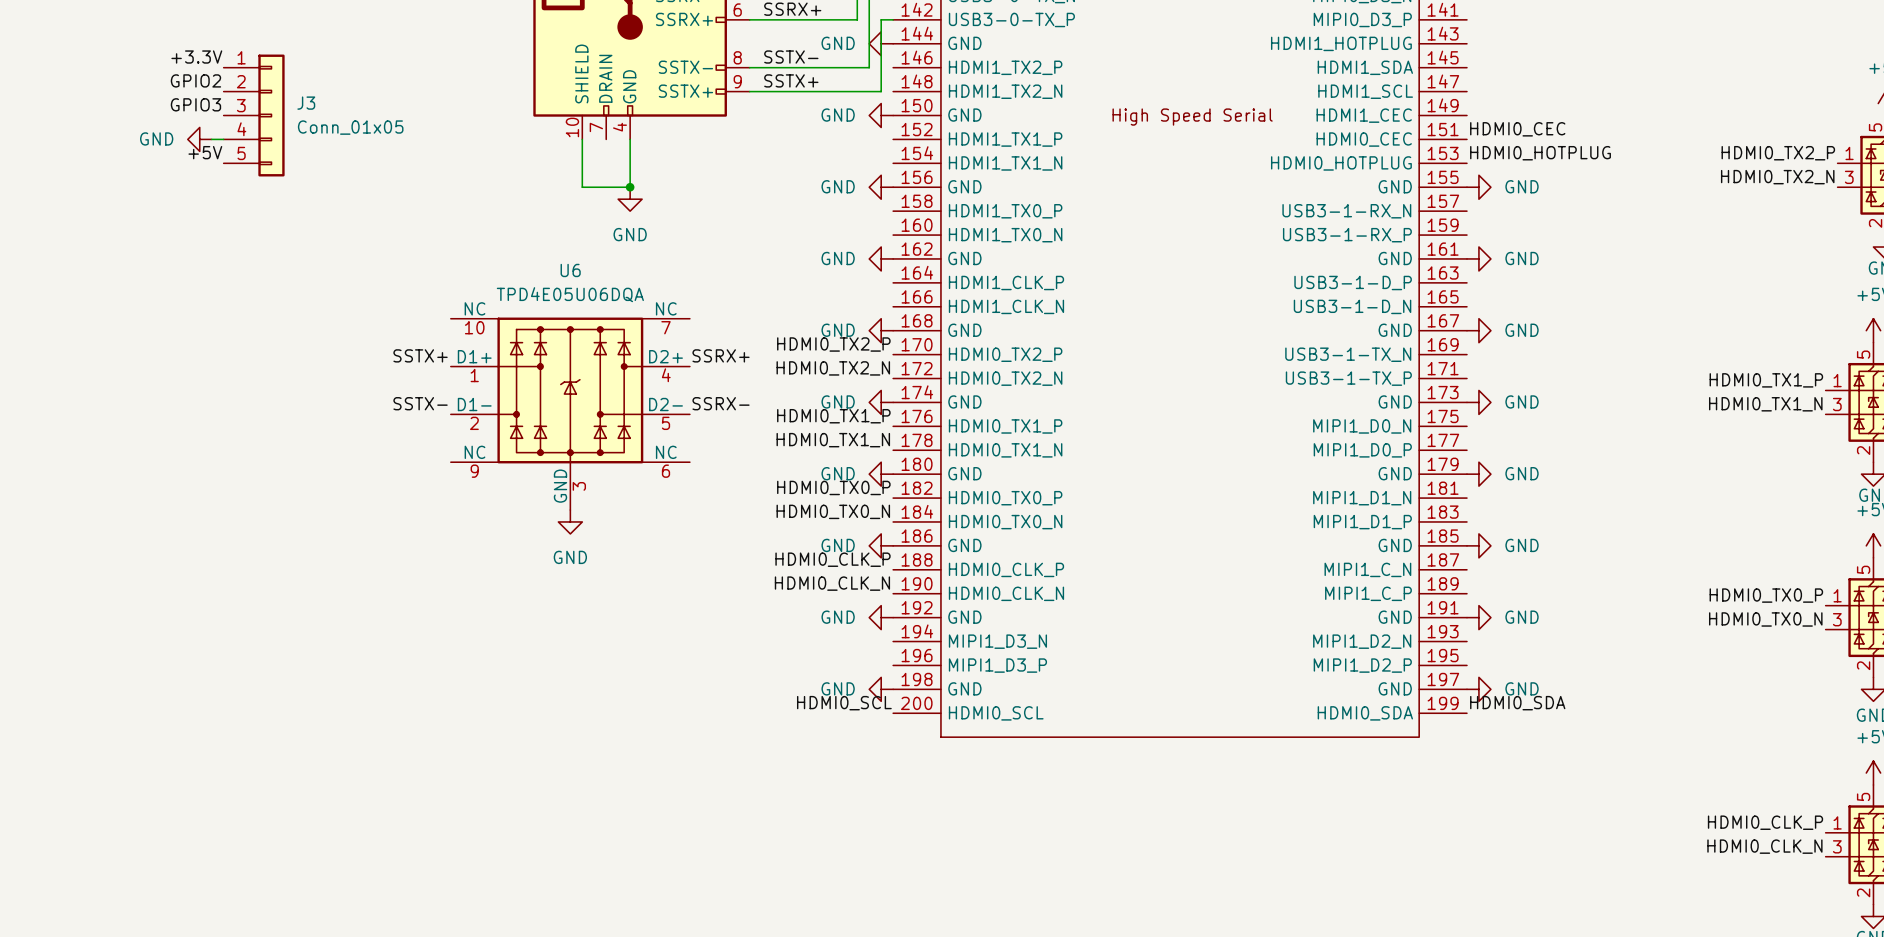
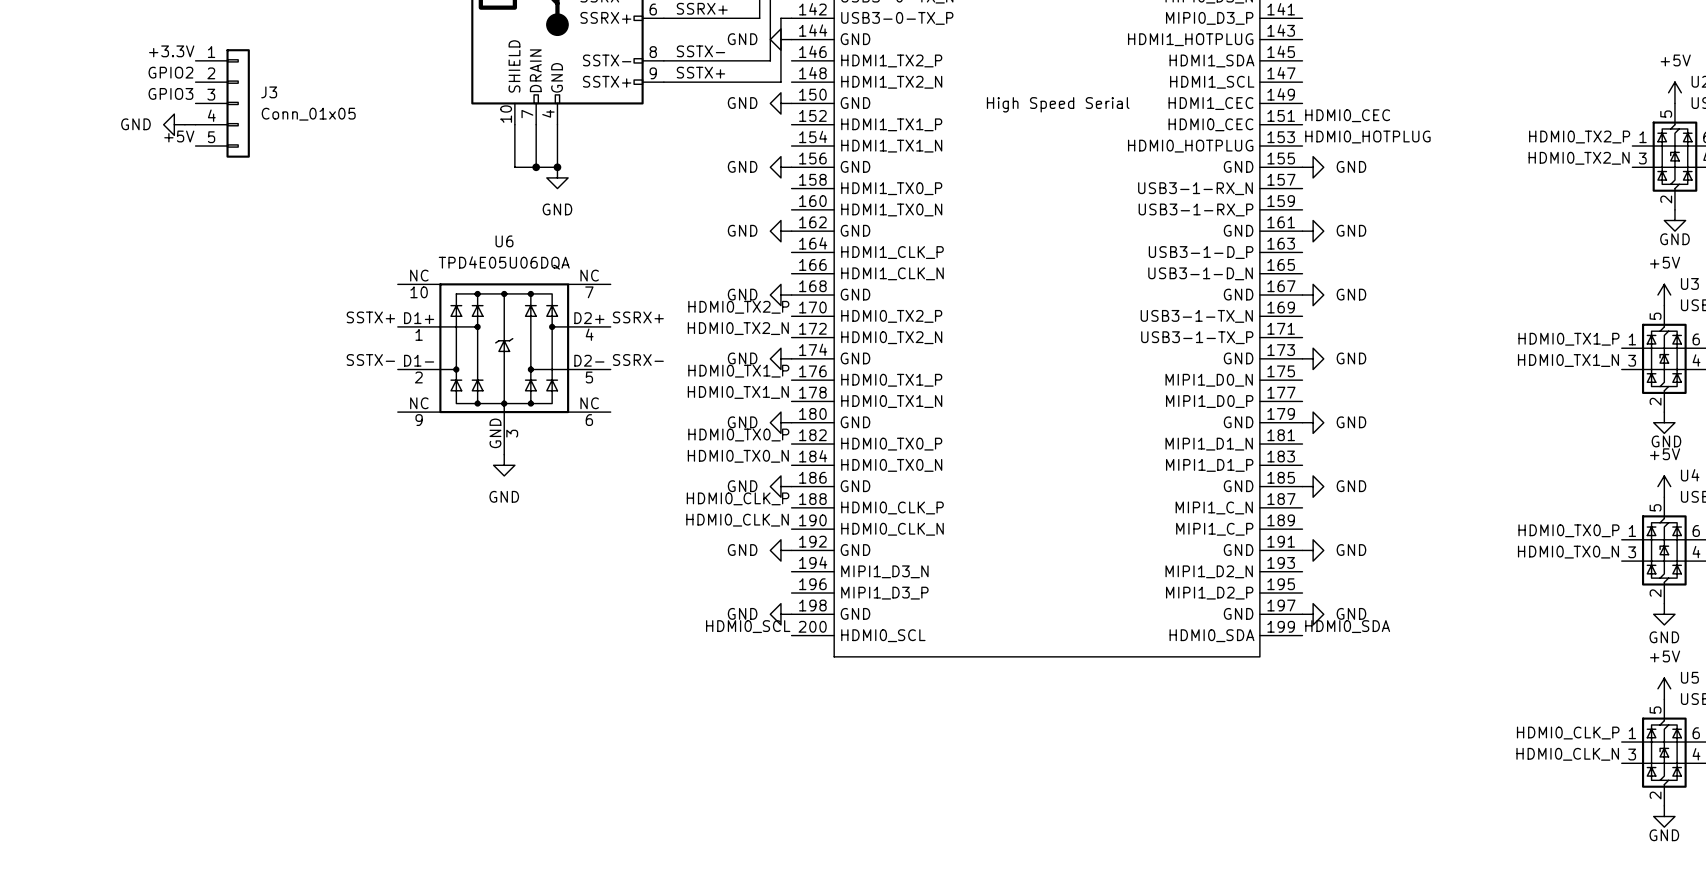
wire: none -> (536, 124) (536, 167)
junction: none -> (536, 167)

